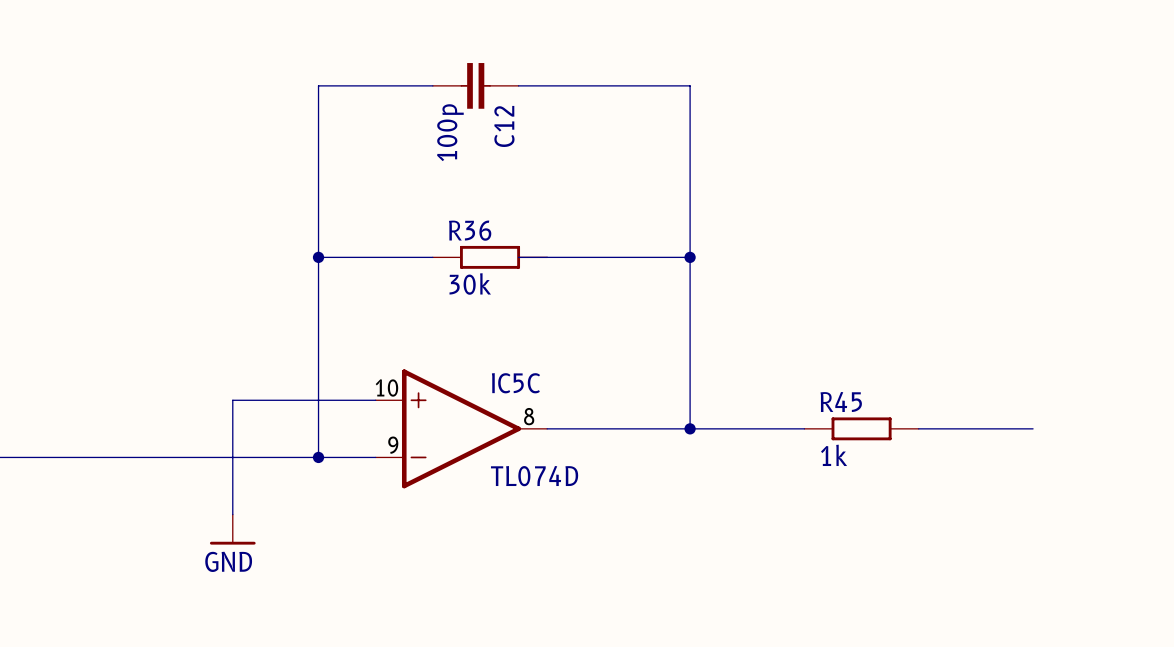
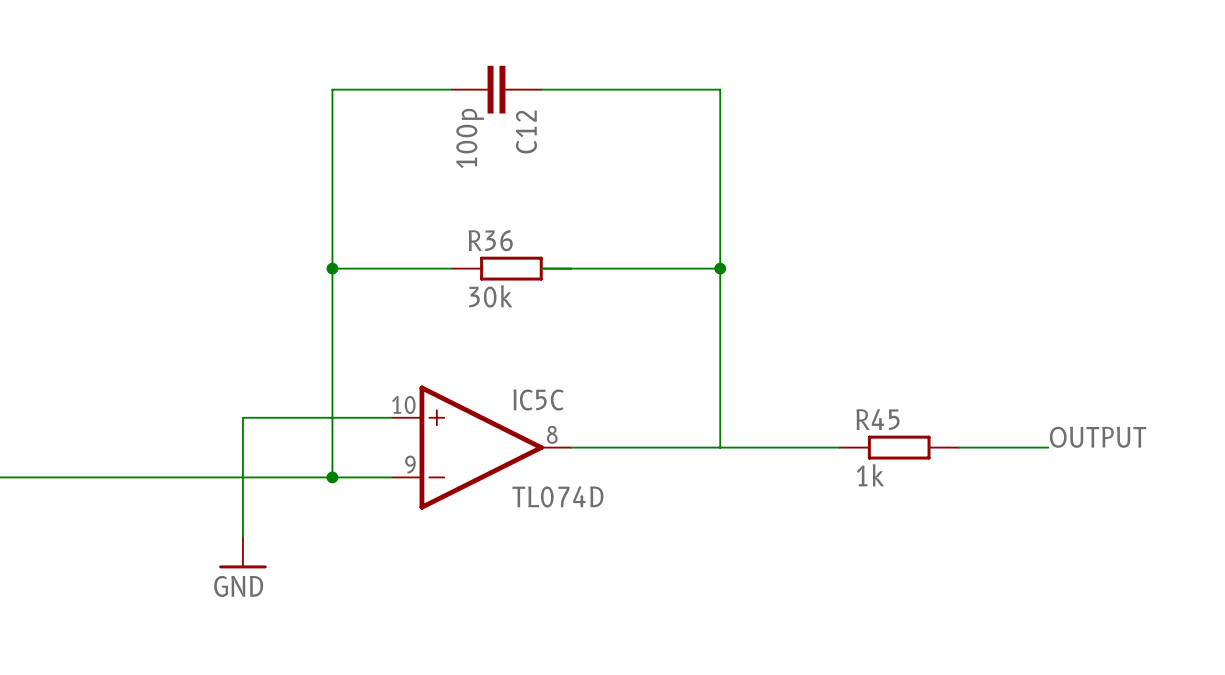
label: none -> OUTPUT (1098, 437)
junction: (690, 428) -> none
wire: (1004, 428) (1033, 428) -> none

